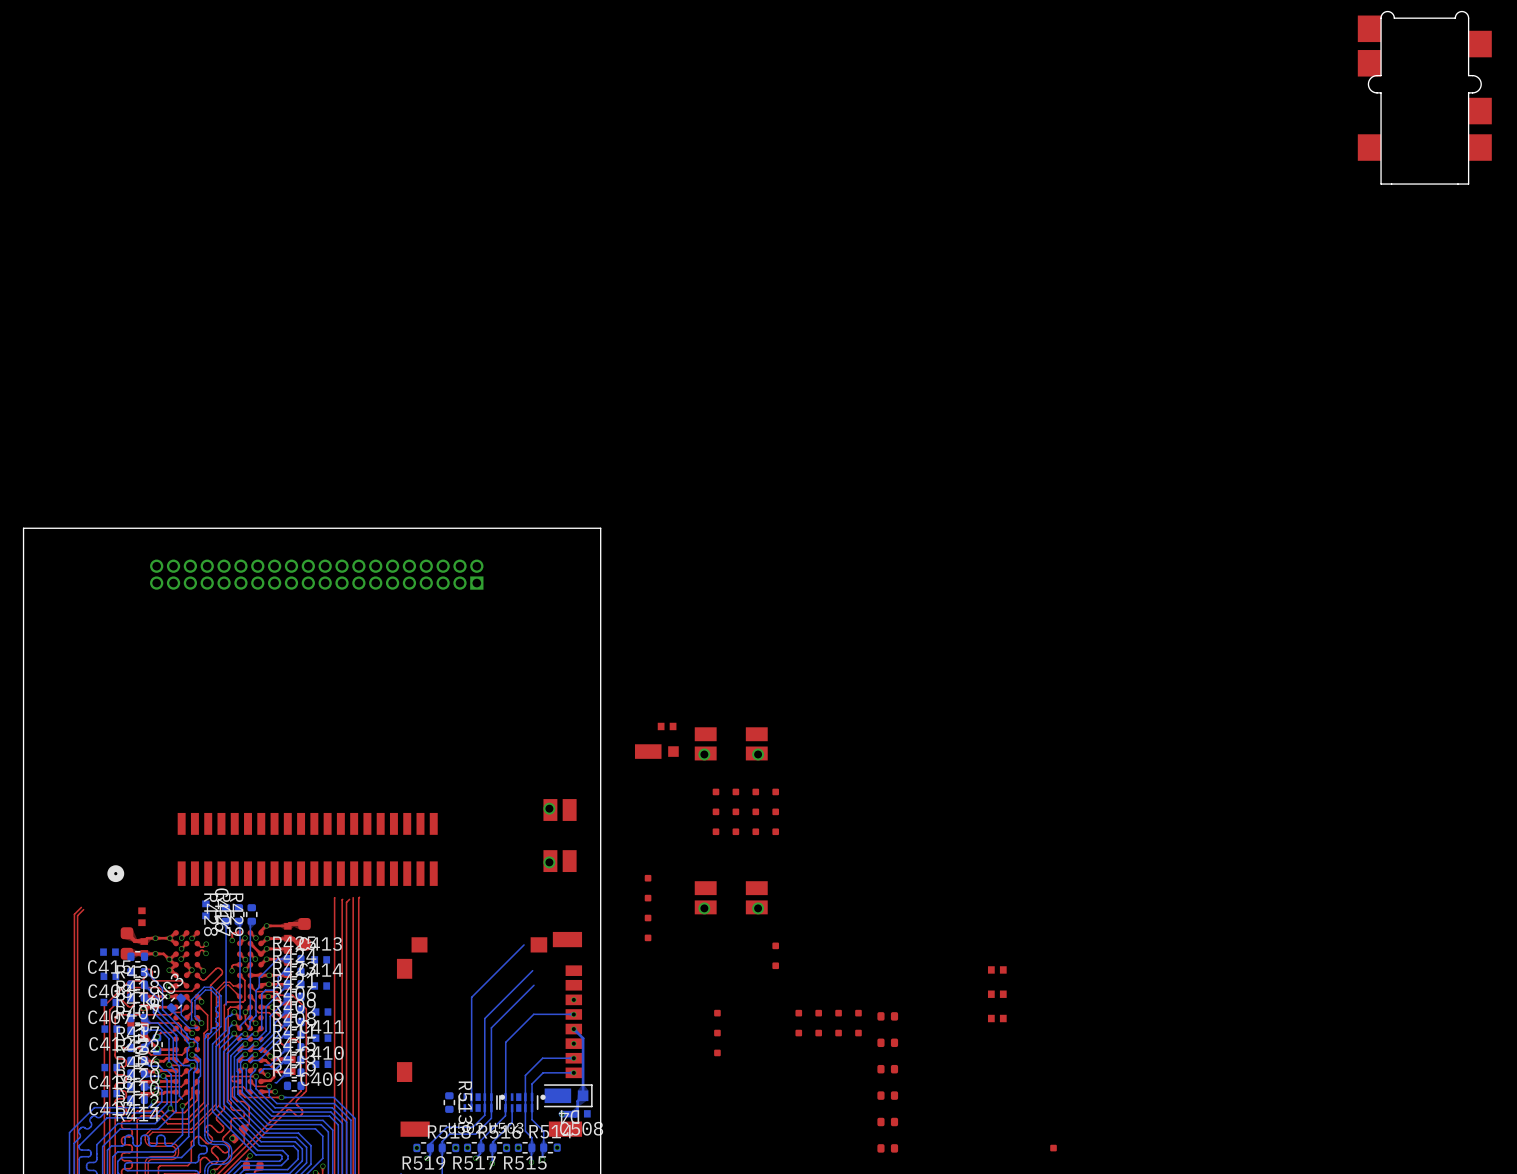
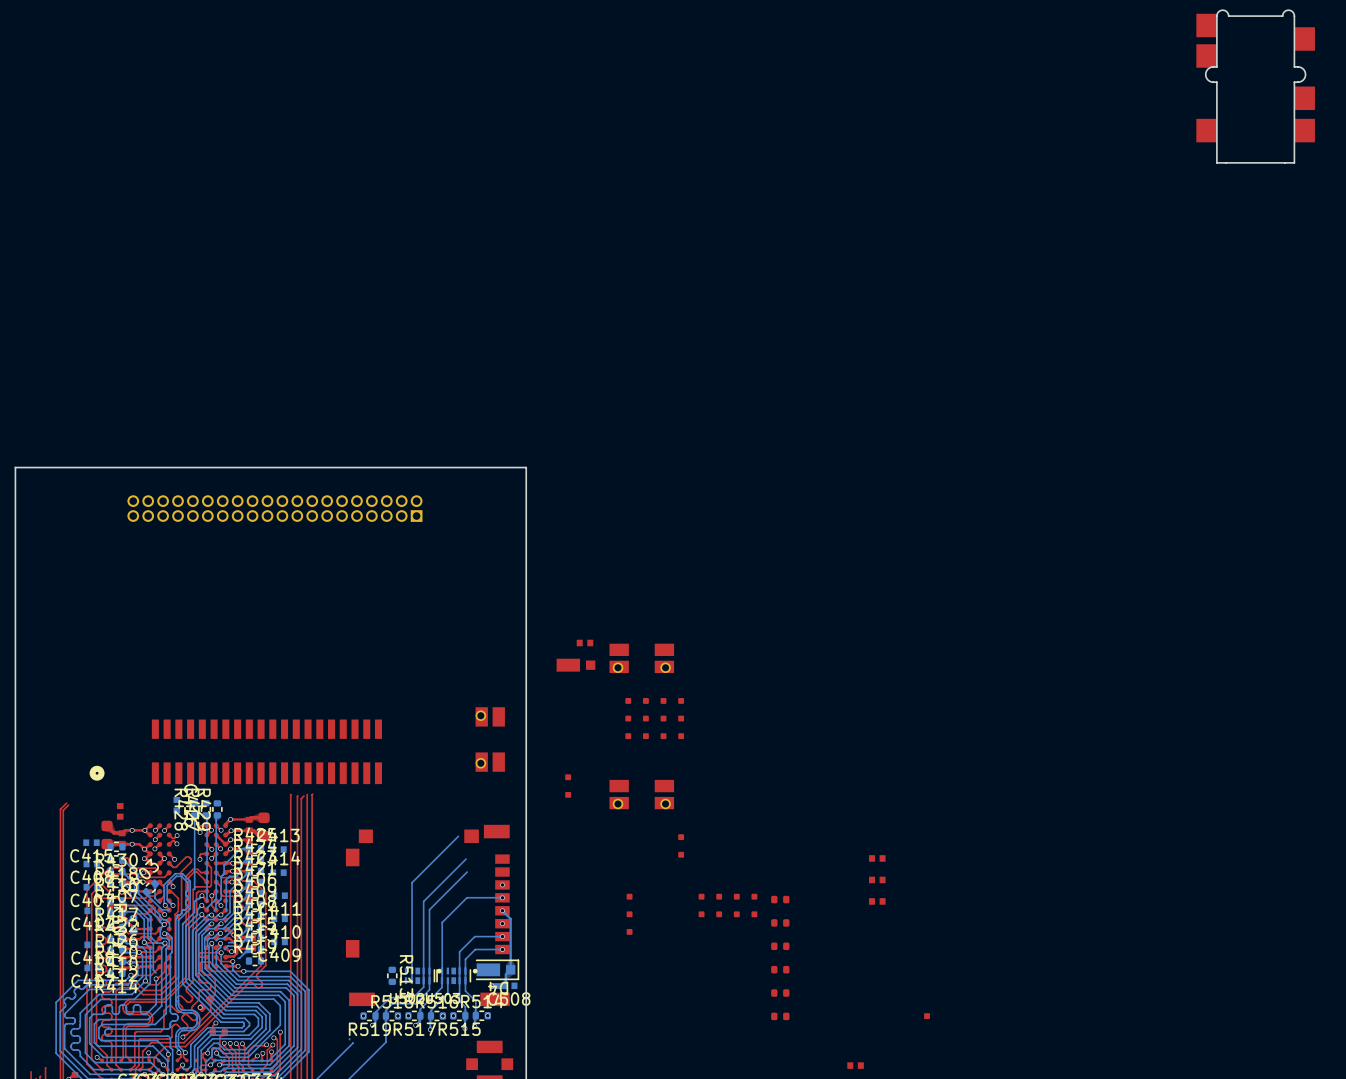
part: (648, 918) -> none
part: (648, 937) -> none

